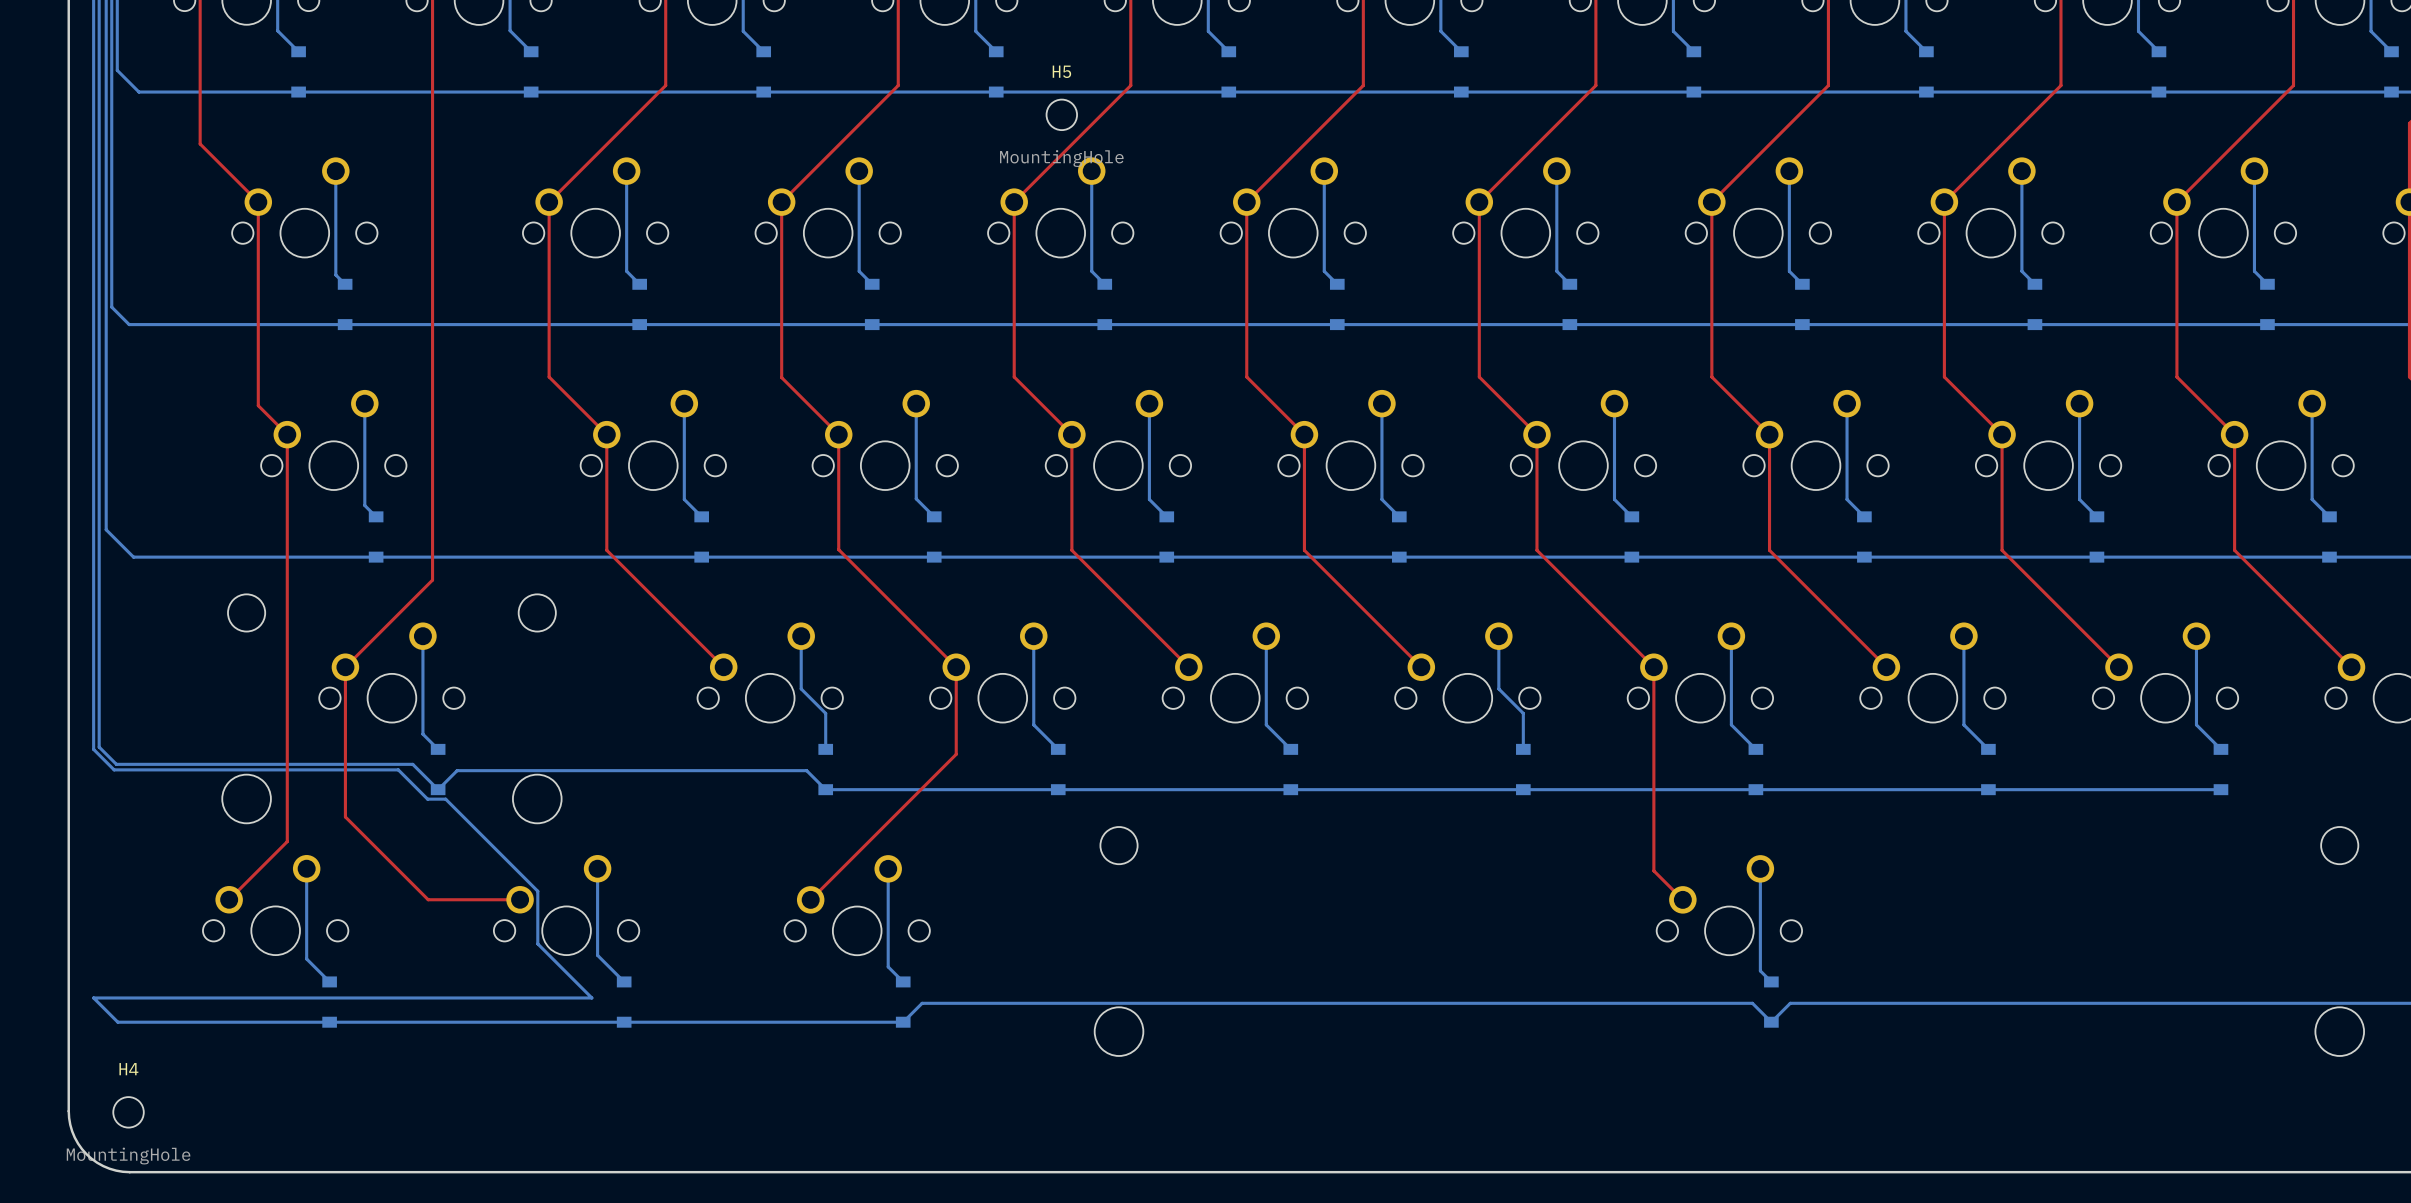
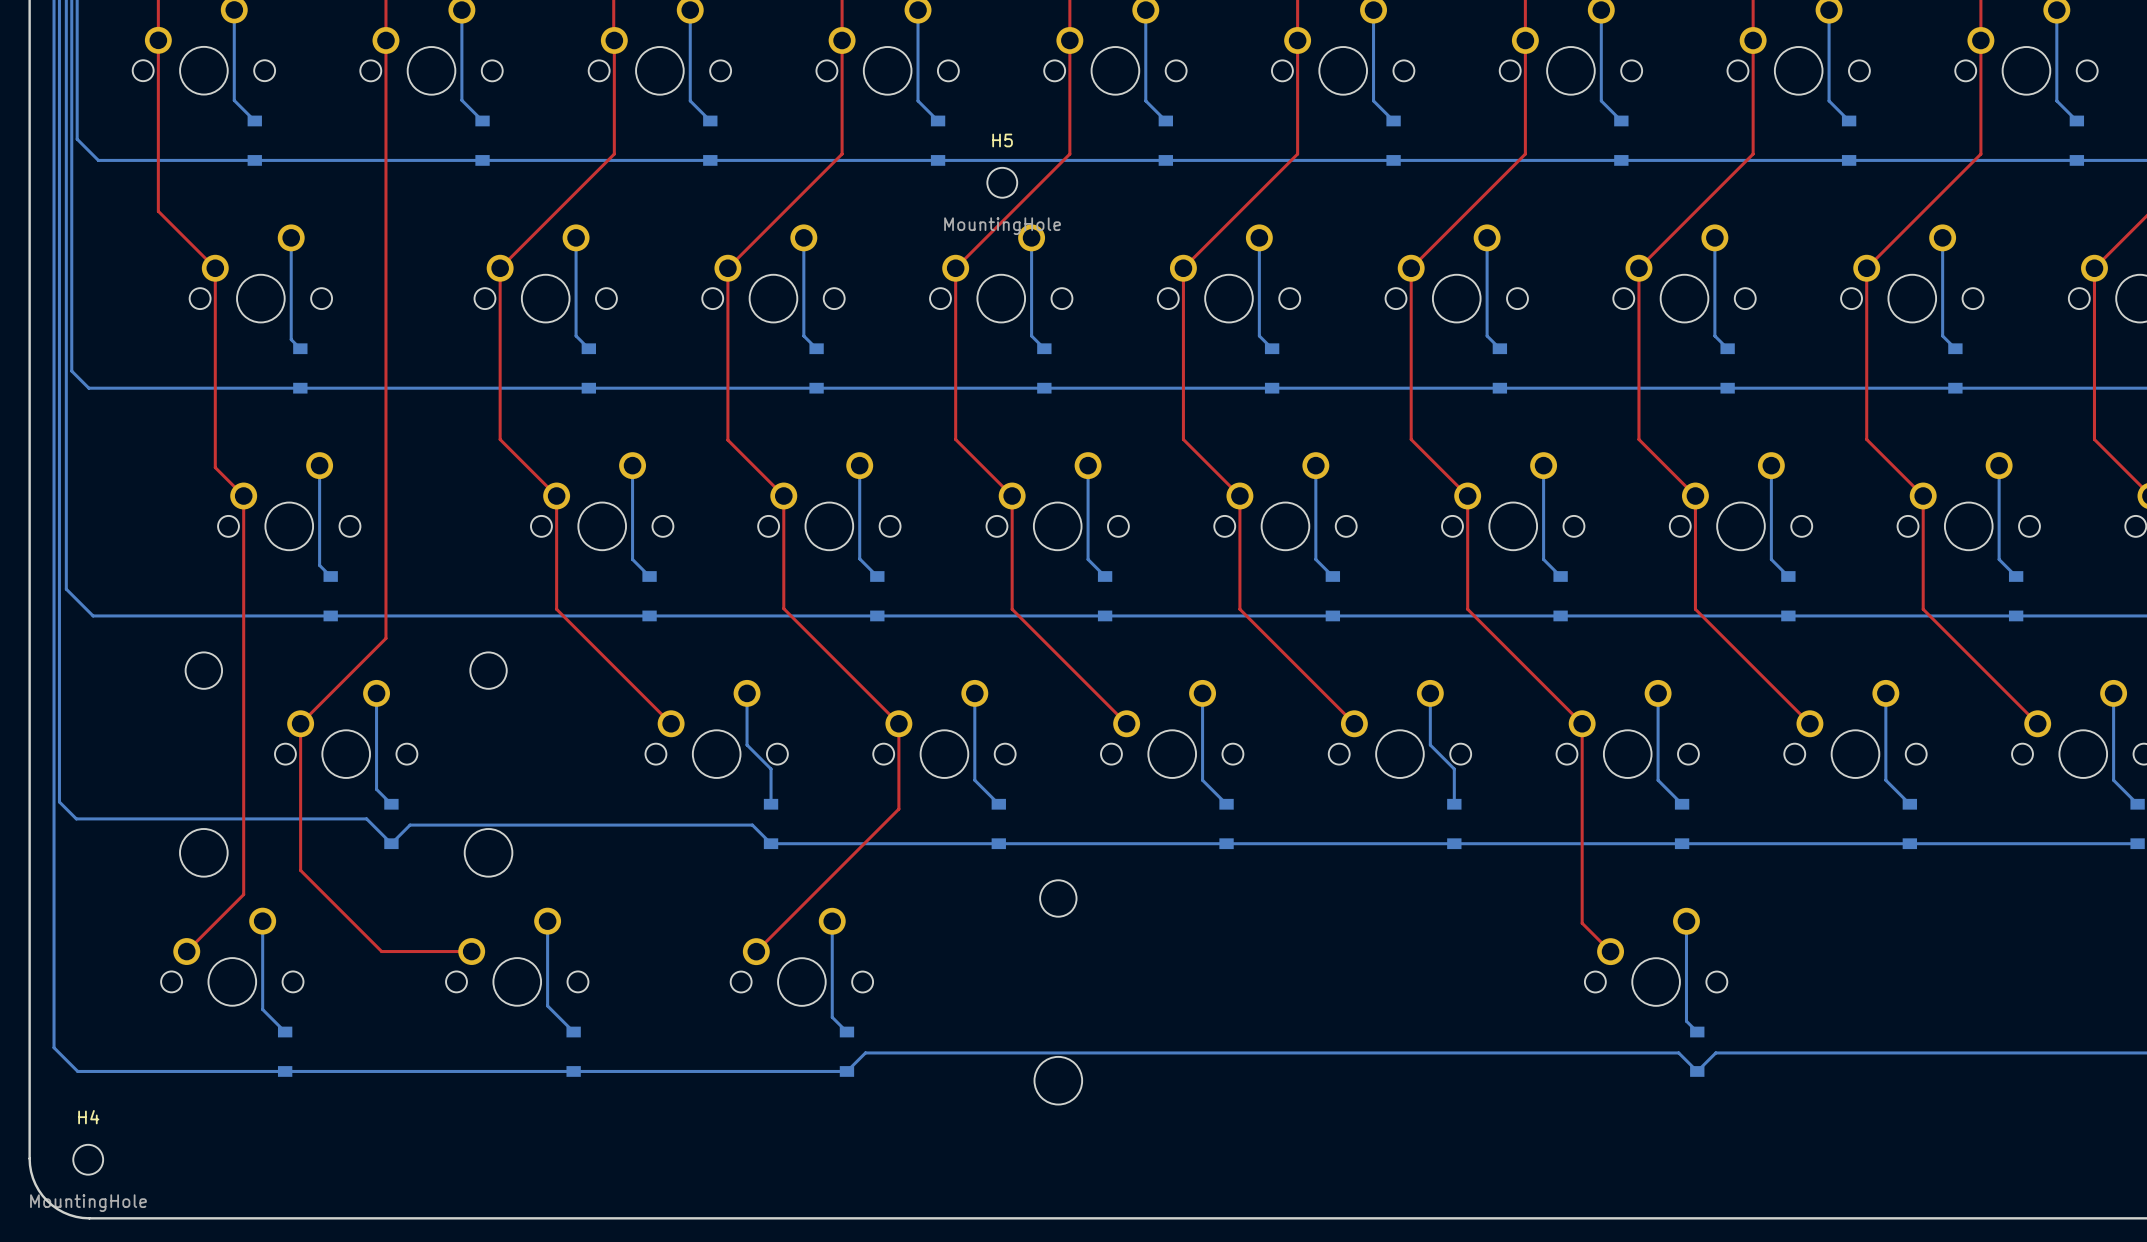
bottom track: (93, 749) (114, 769) (398, 769) (427, 799) (445, 799) (537, 891) (537, 943) (591, 997) (93, 997) -> (54, 804) (54, 1047)

